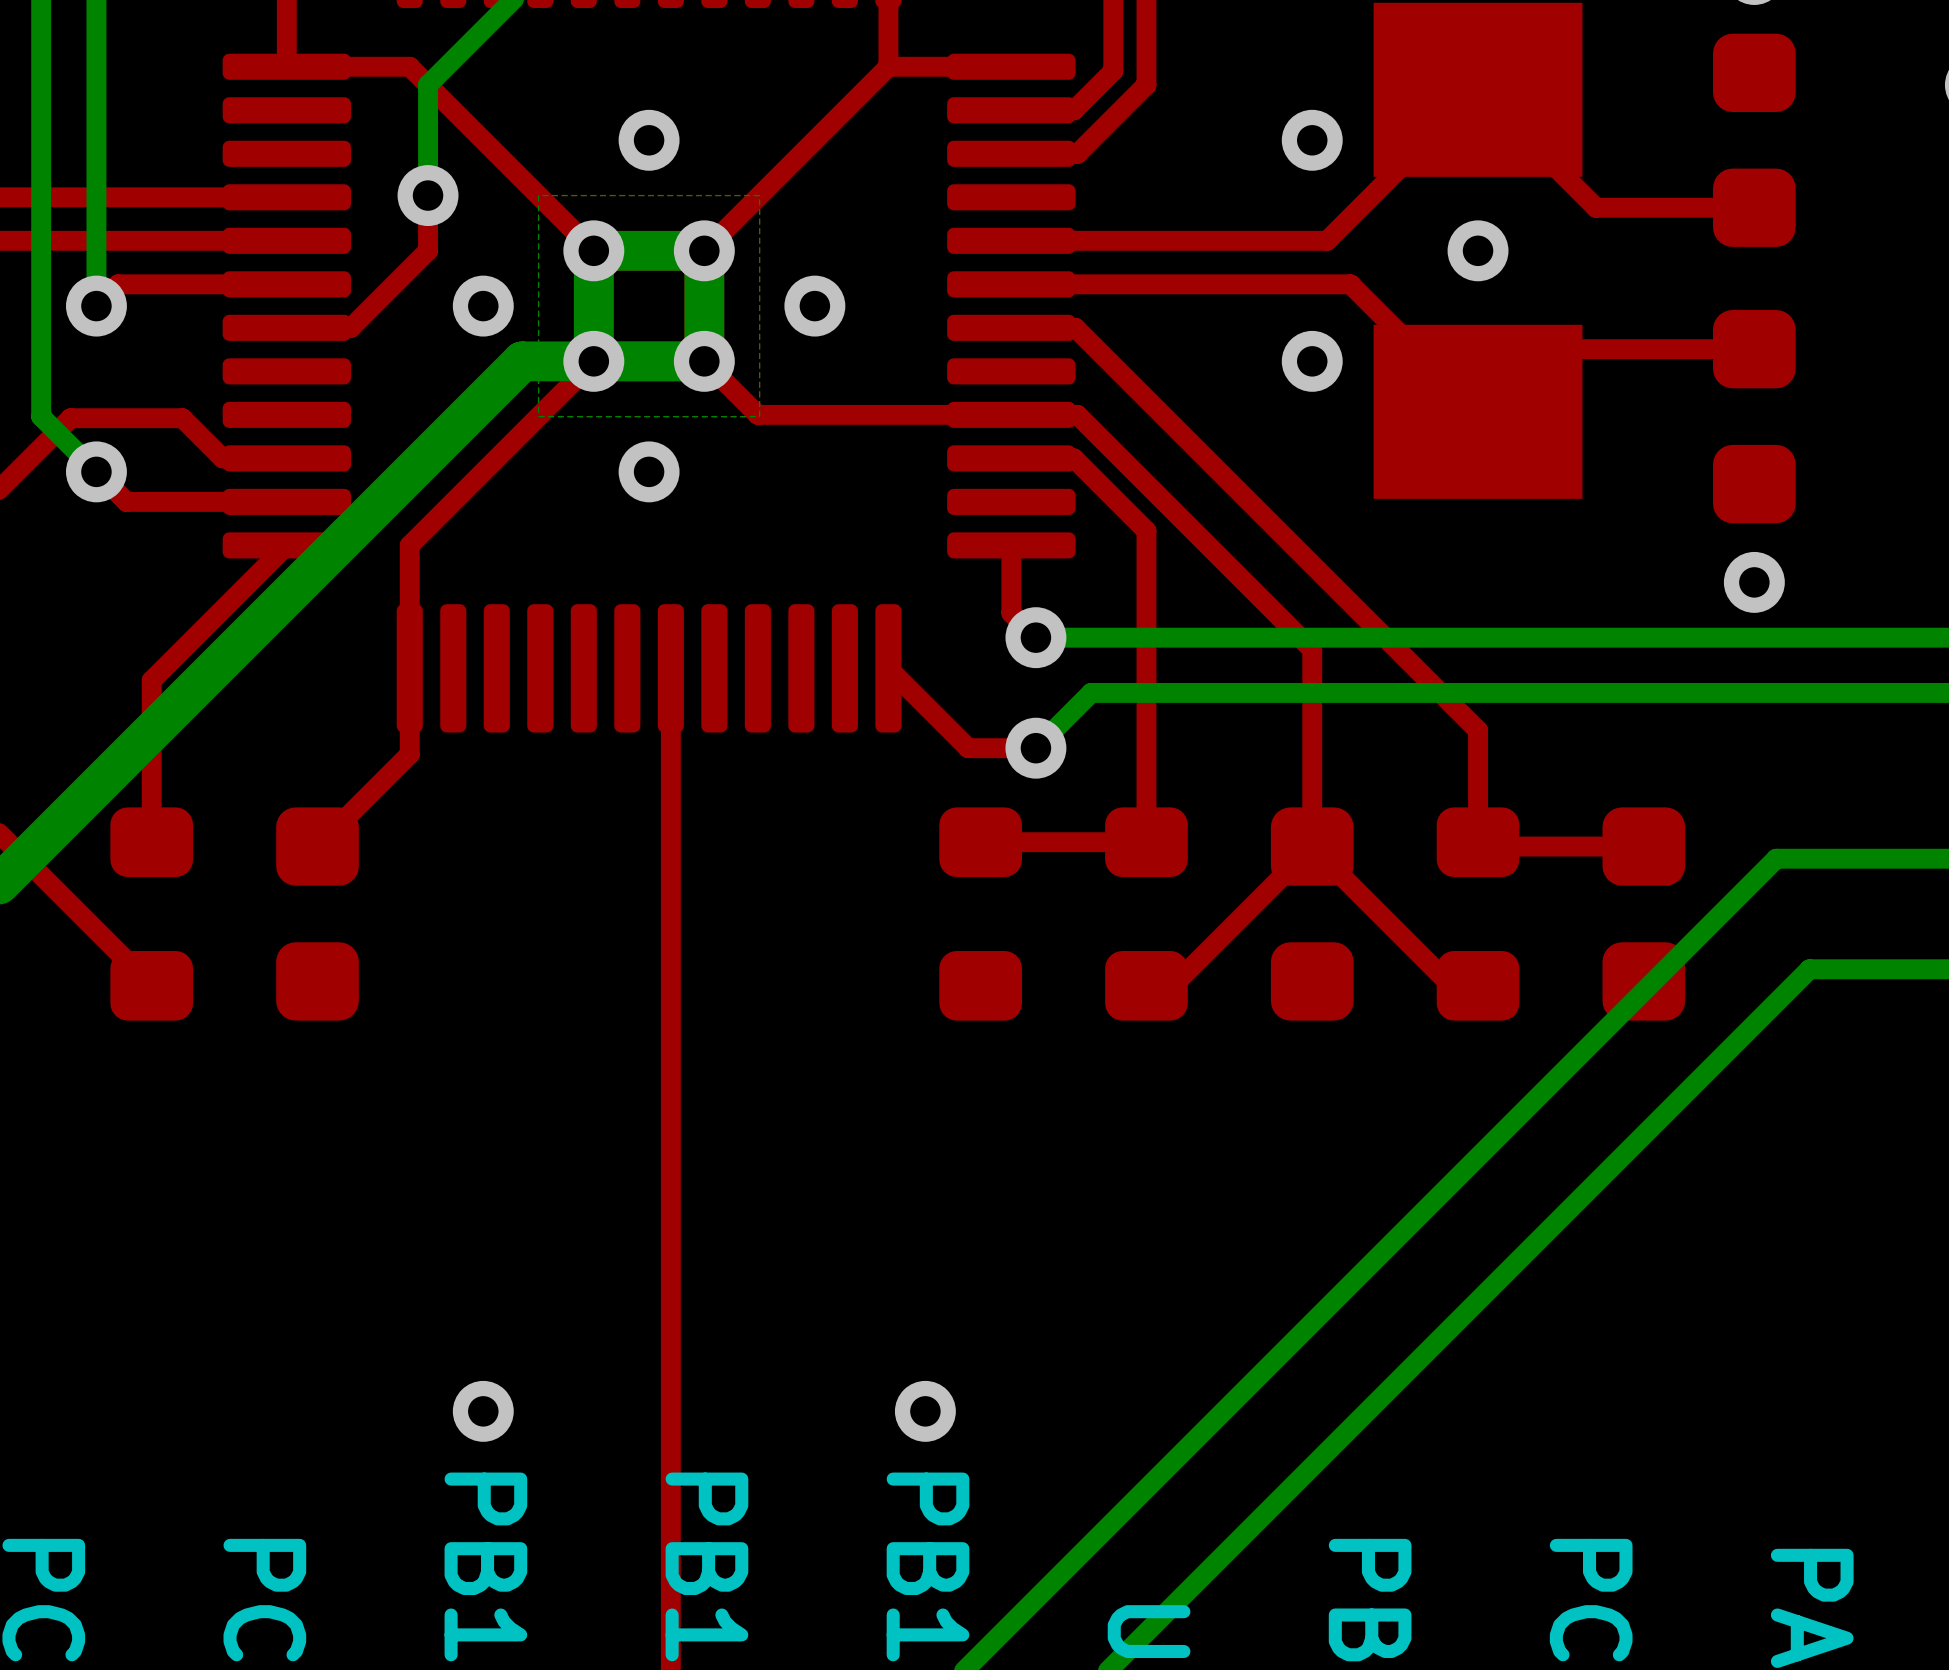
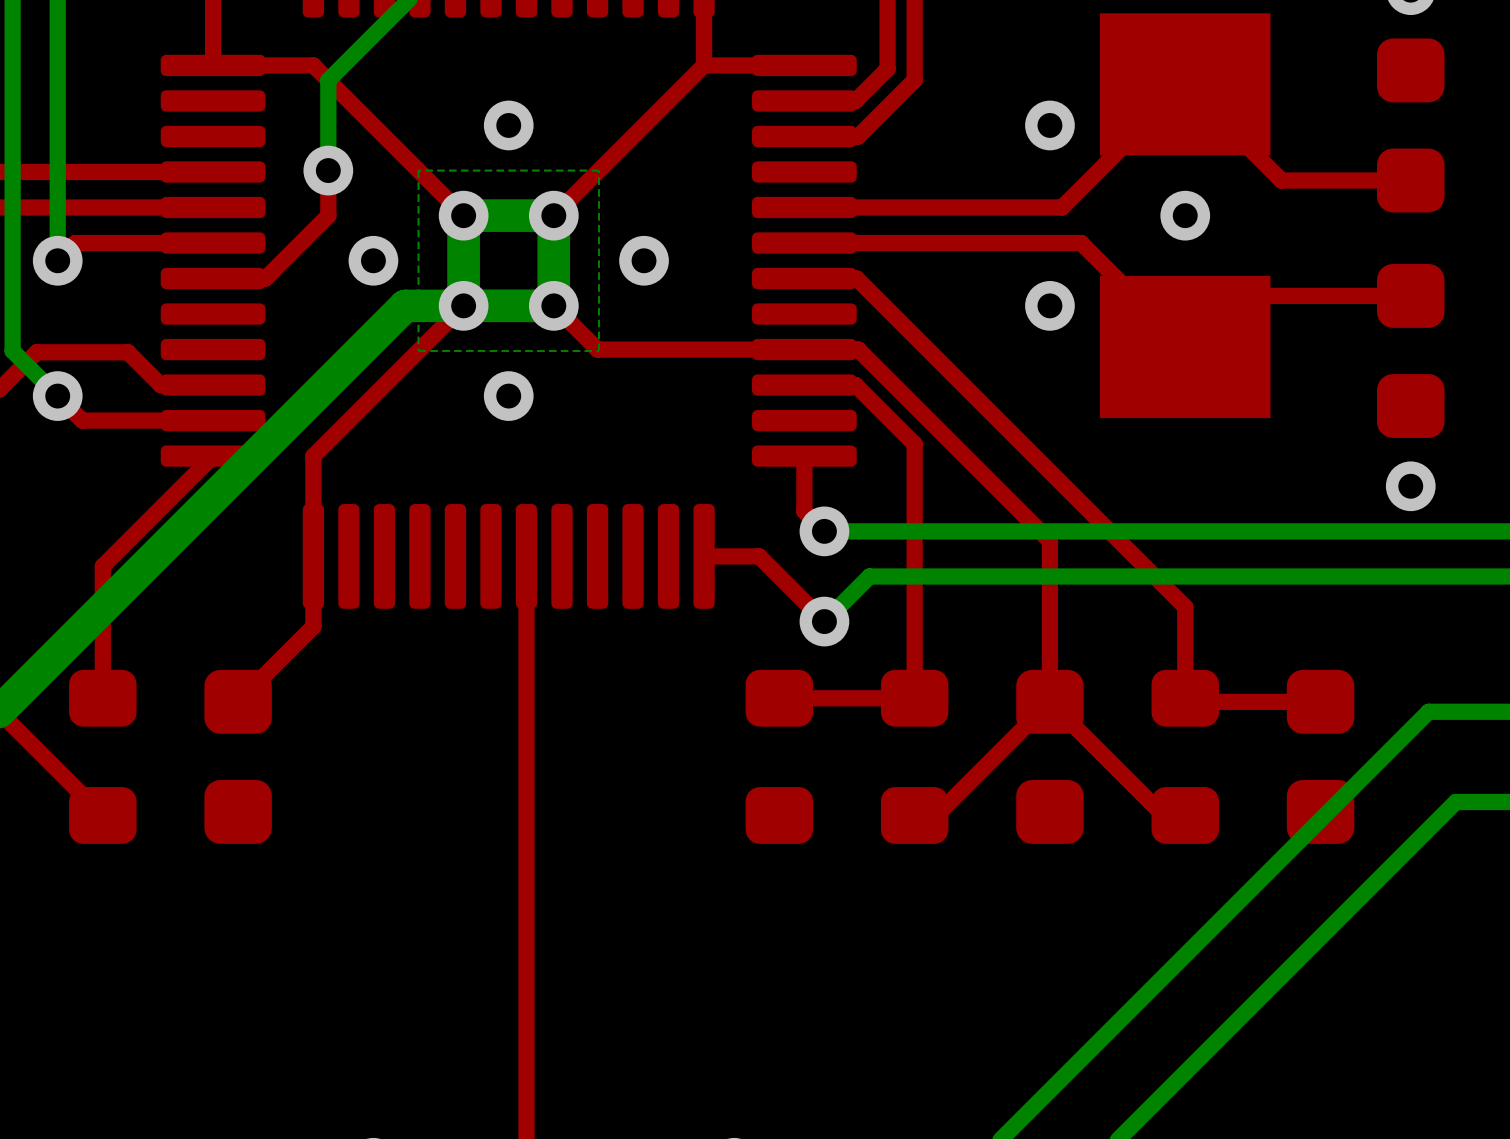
top track: (888, 668) (968, 748) (1035, 748) -> (704, 556) (759, 556) (824, 621)

